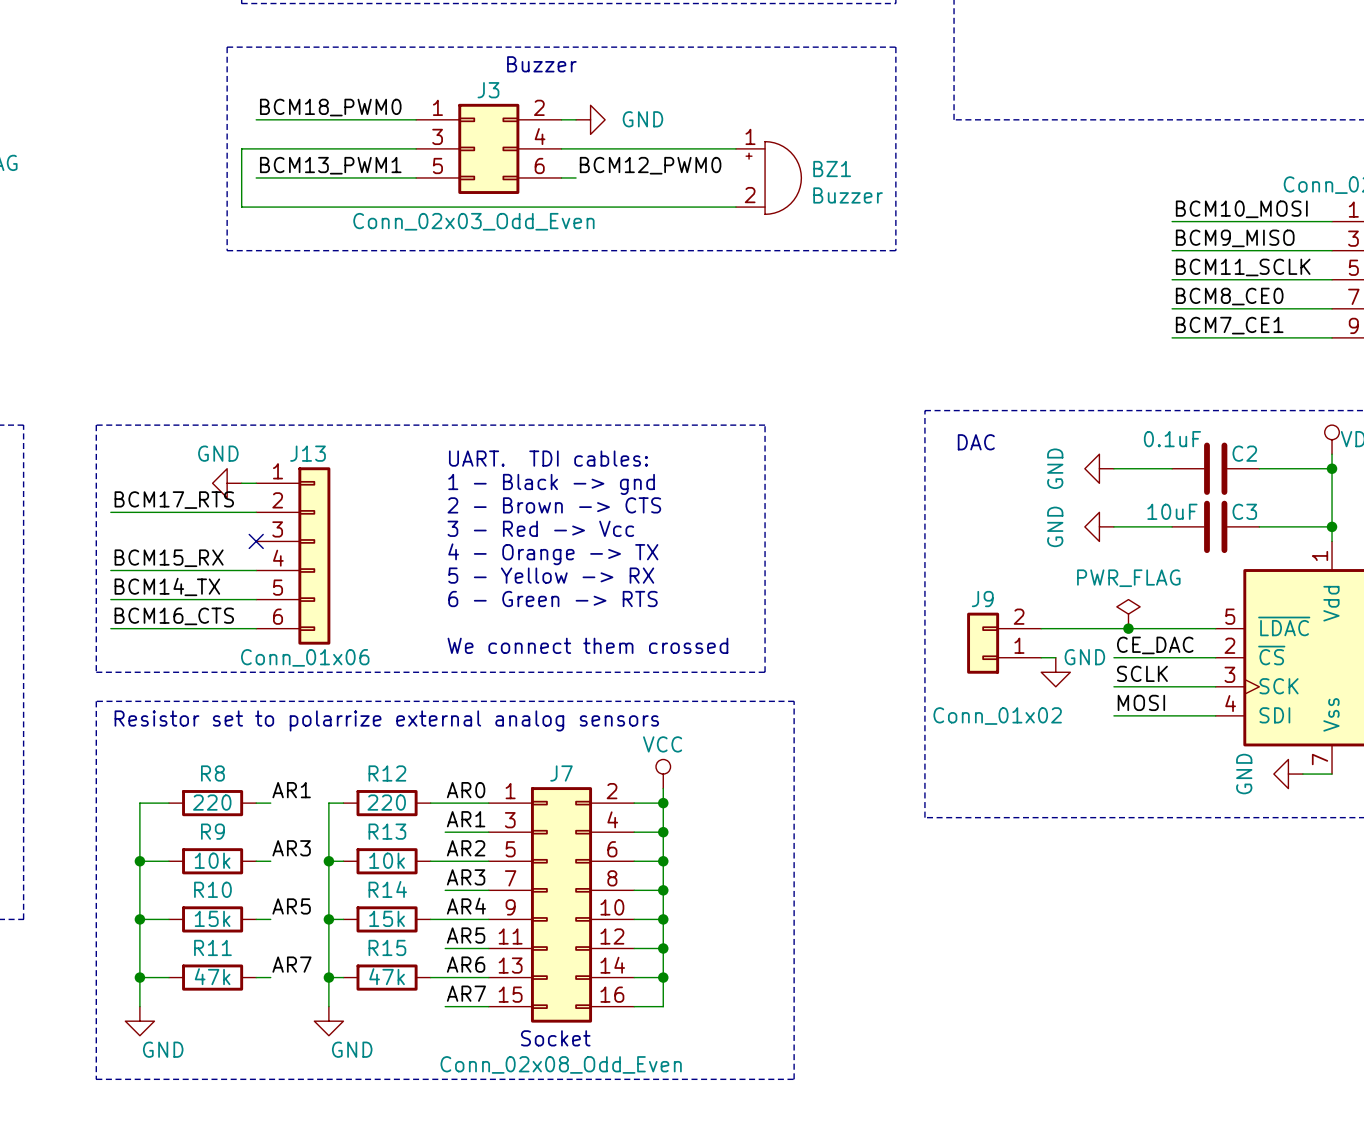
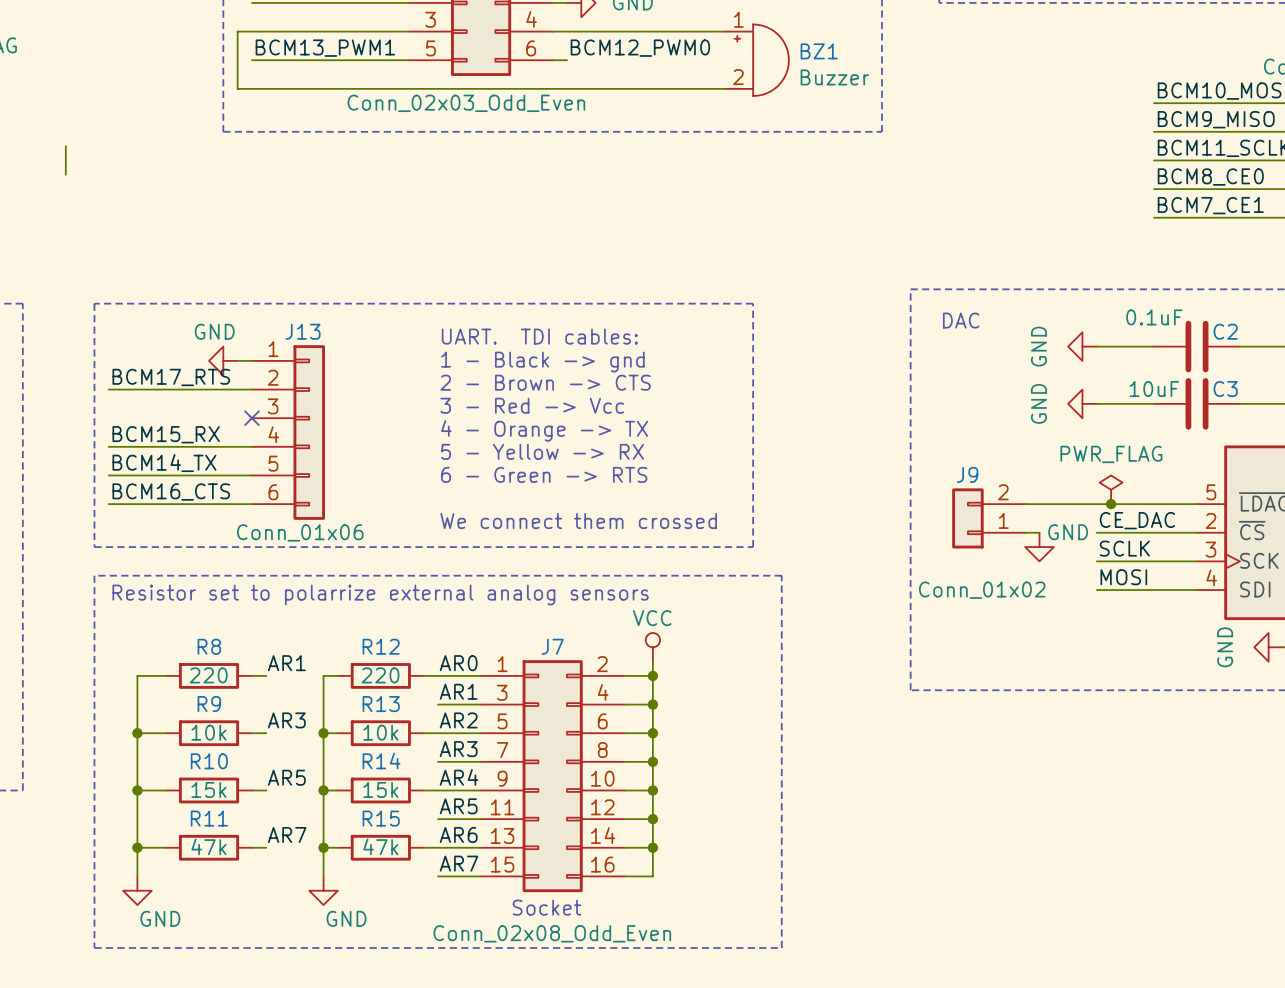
wire: none -> (65, 146) (65, 174)

